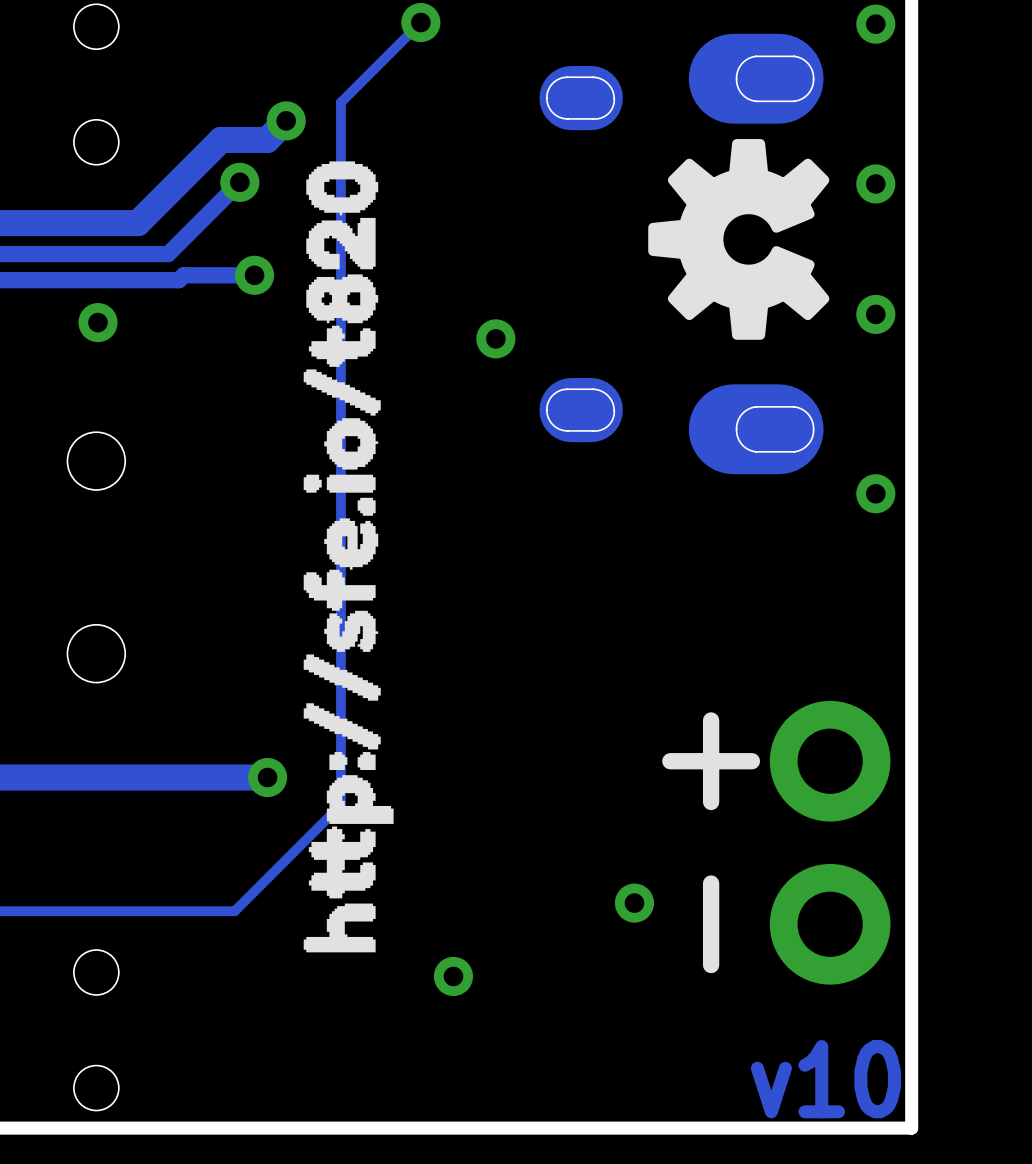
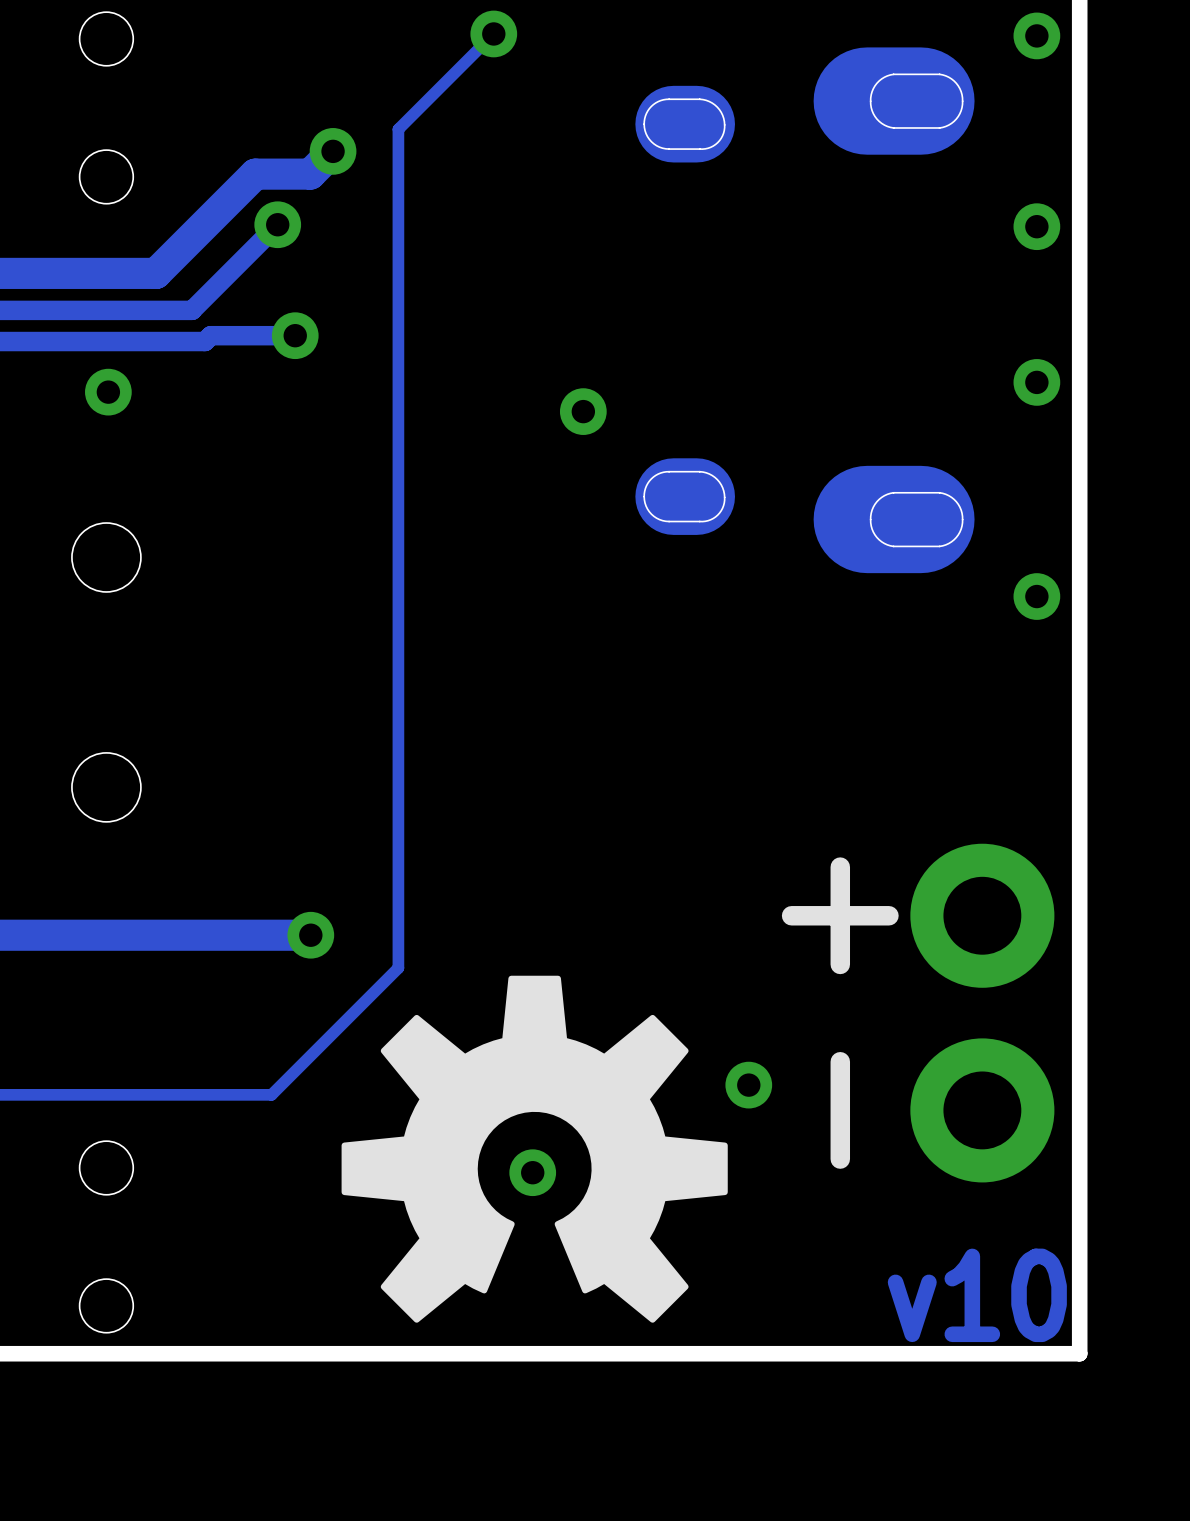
drawing: [648, 139, 830, 340] -> none
drawing: [303, 161, 394, 953] -> none
drawing: none -> [341, 975, 728, 1323]

